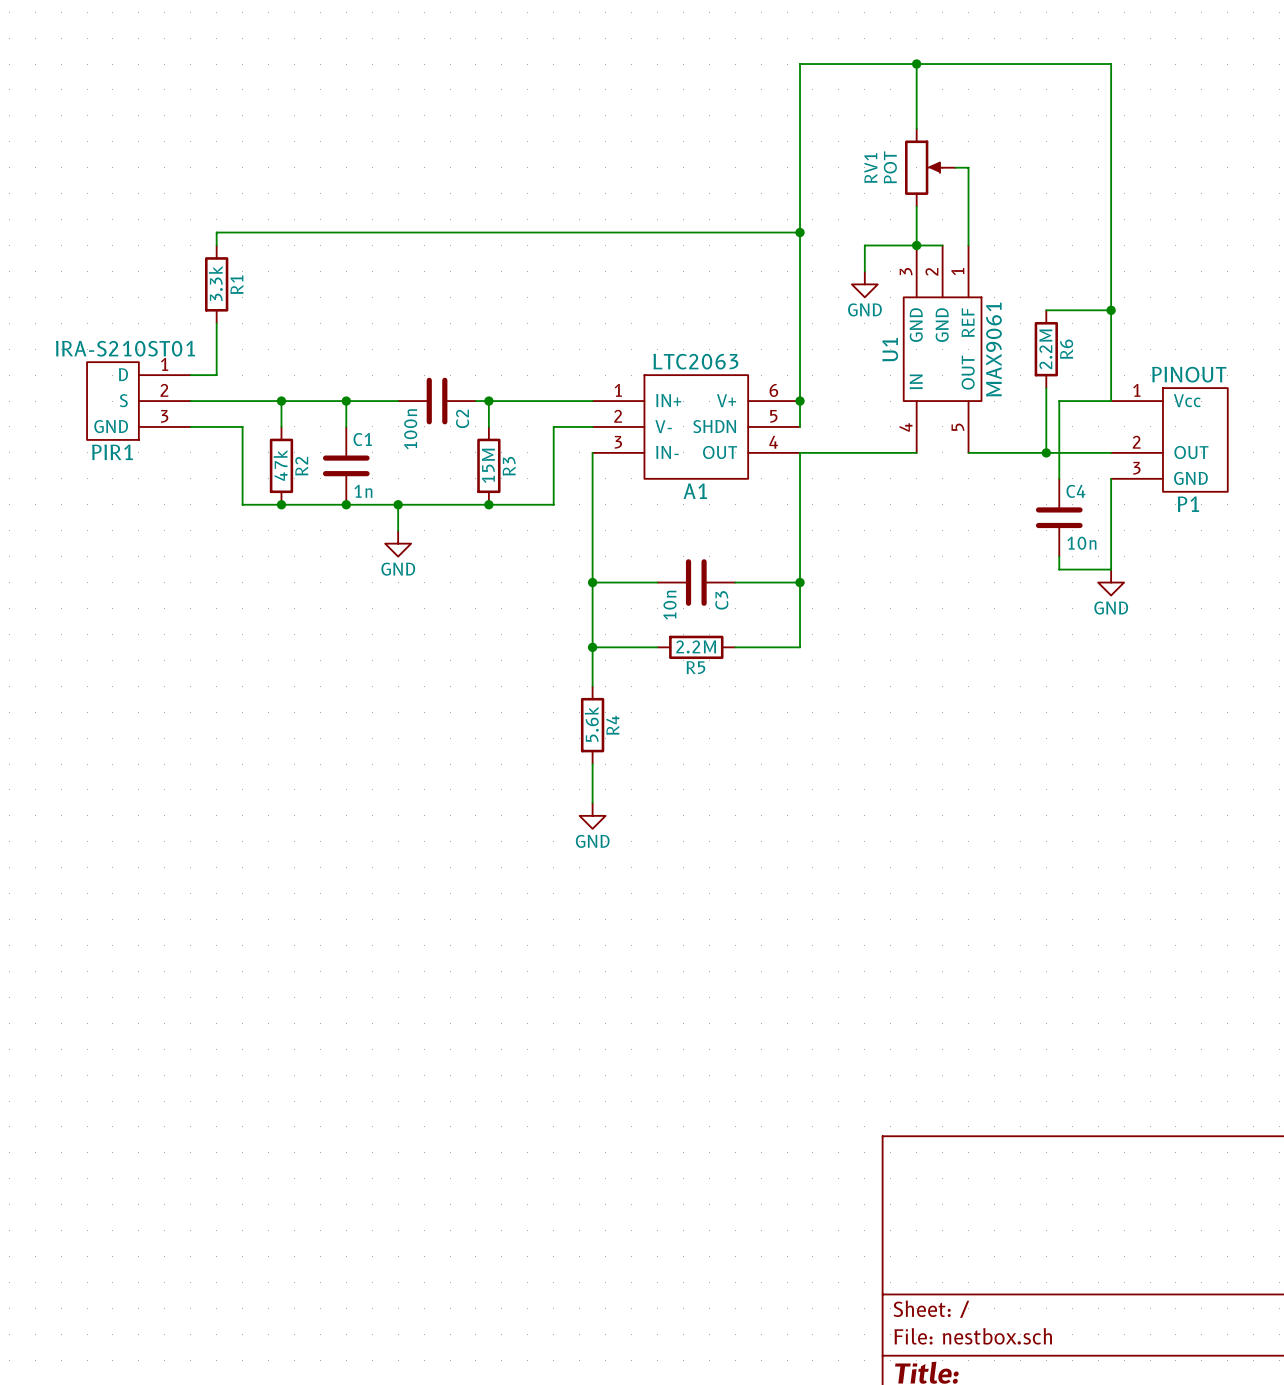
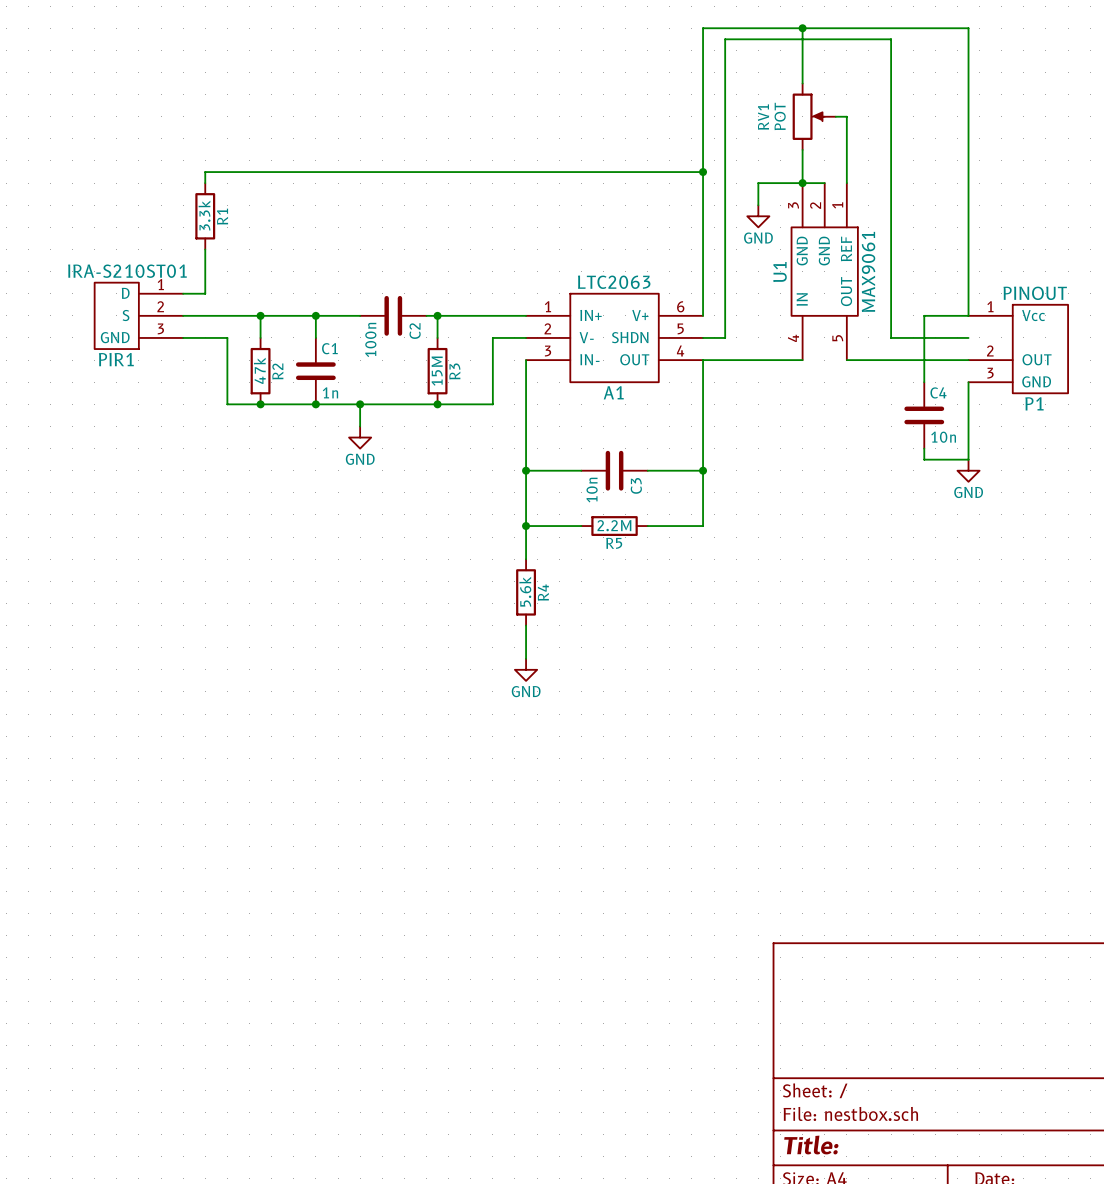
wire: (1046, 310) (1111, 310) -> none
junction: (1111, 310) -> none
R6: 2.2M (1046, 349) -> none
wire: (1046, 388) (1046, 452) -> none
wire: (800, 401) (800, 426) -> (968, 337) (891, 337) (891, 39) (725, 39) (725, 337) (703, 337)
junction: (800, 401) -> none
junction: (1046, 452) -> none

